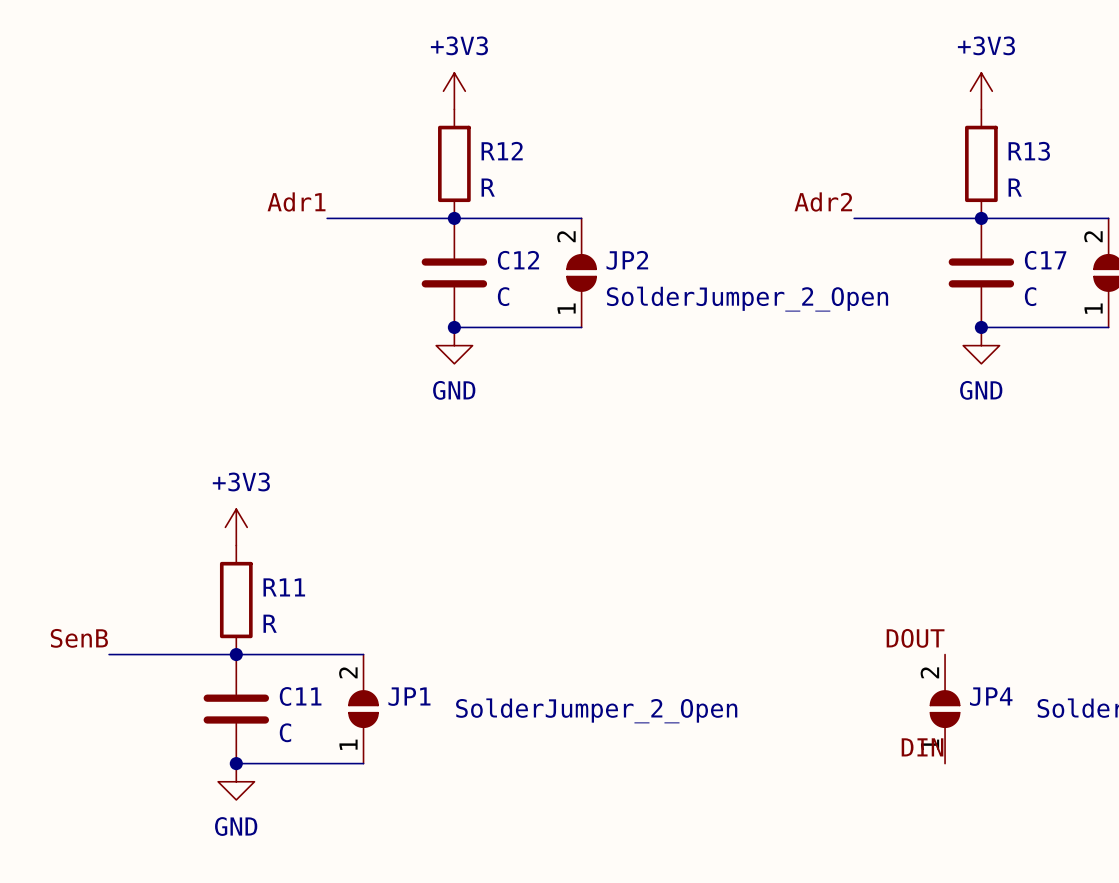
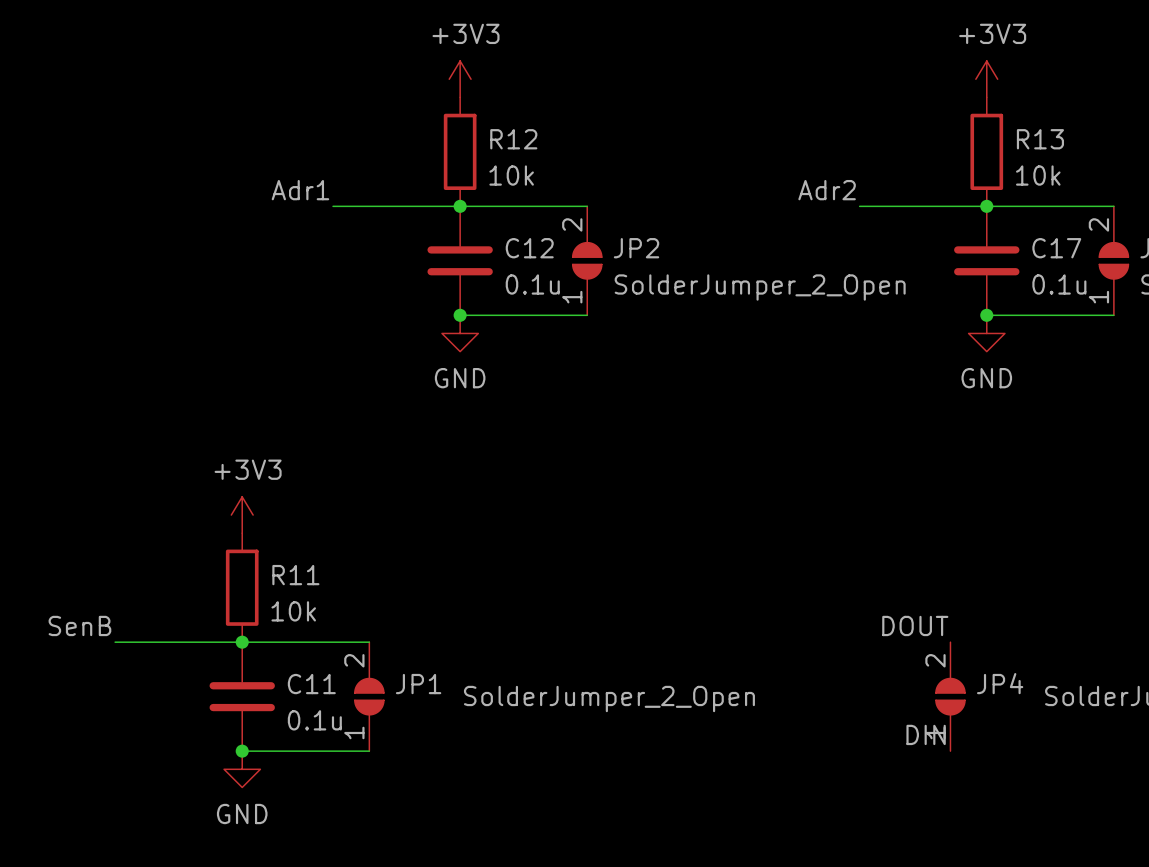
R12 value: R (488, 187) -> 10k (511, 175)
R13 value: R (1015, 187) -> 10k (1038, 175)
C12 value: C (503, 296) -> 0.1u (532, 284)
C17 value: C (1030, 296) -> 0.1u (1059, 284)
R11 value: R (270, 623) -> 10k (293, 611)
C11 value: C (285, 732) -> 0.1u (314, 720)

